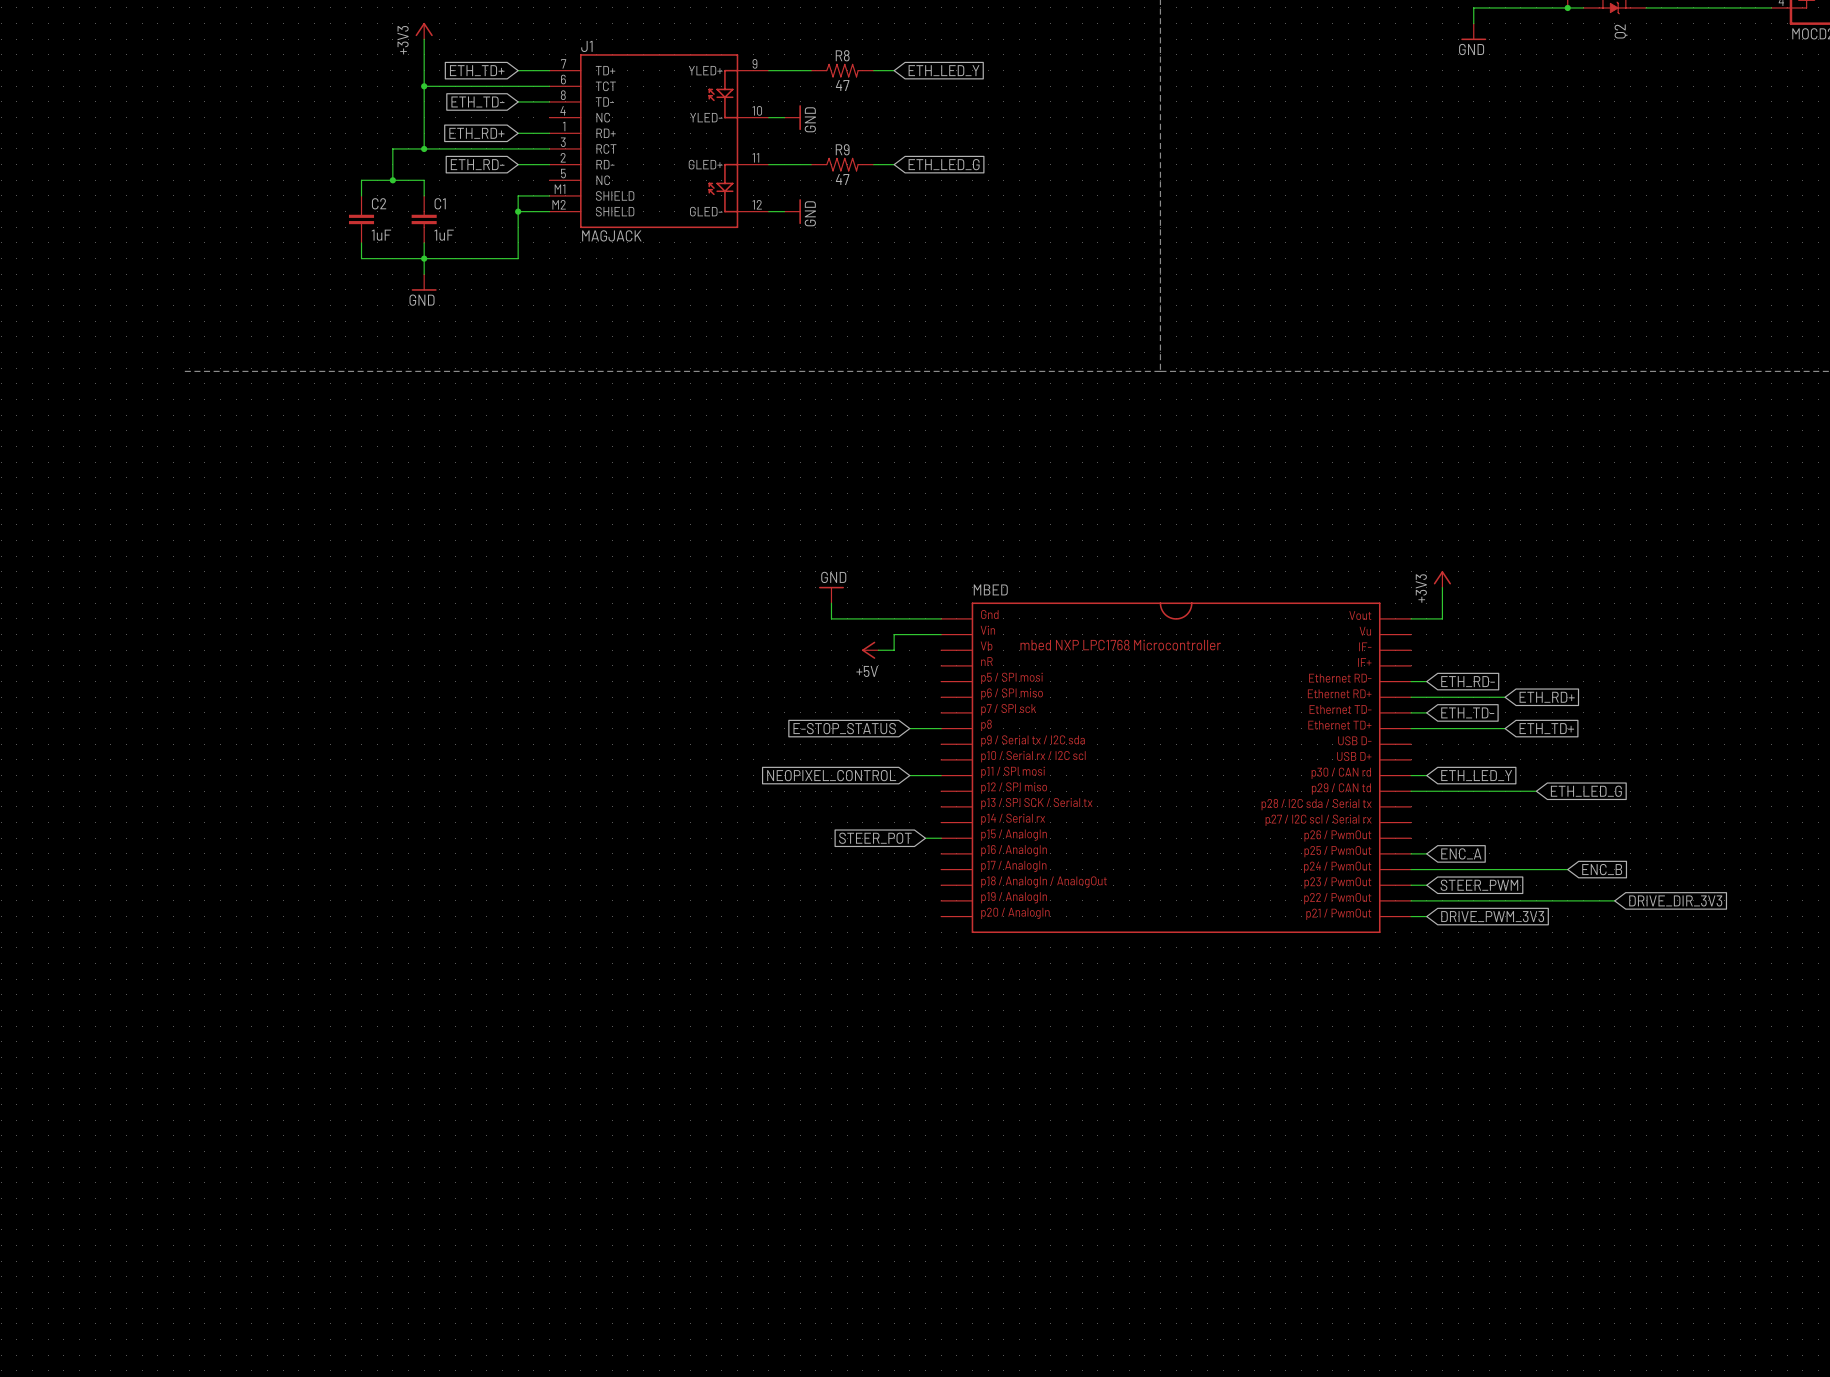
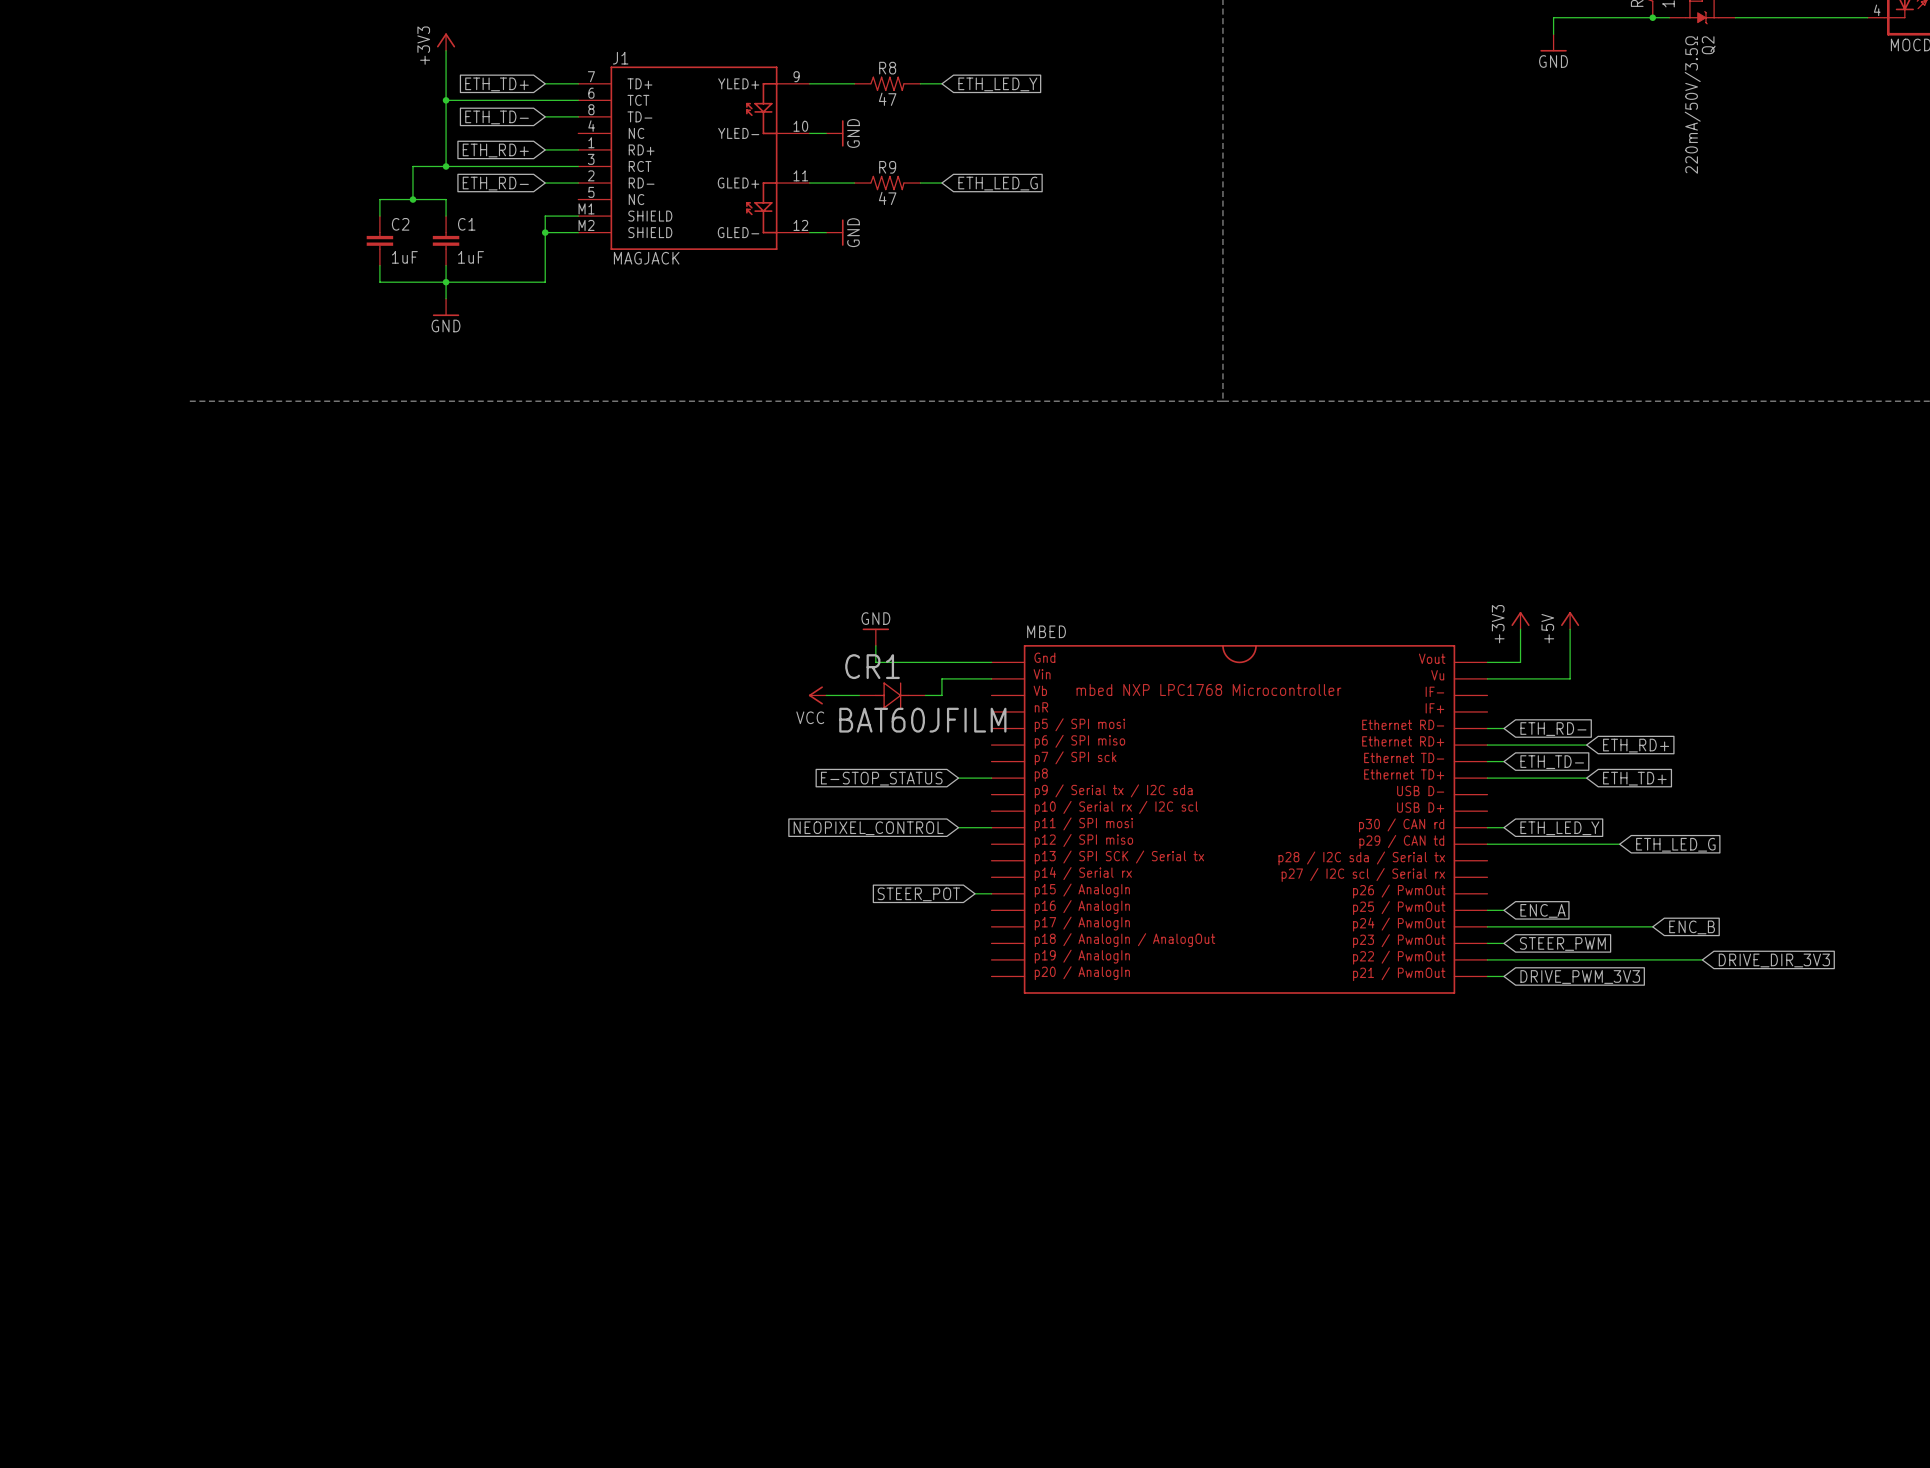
Q2 value: none -> 220mA/50V/3.5Ω (1692, 105)
power symbol: none -> +5V (1570, 620)
wire: none -> (1570, 629) (1570, 678) (1487, 678)
power symbol: none -> VCC (817, 695)
wire: none -> (826, 695) (859, 695)
CR1: none -> BAT60JFILM (892, 695)
power symbol: +5V (870, 650) -> none

